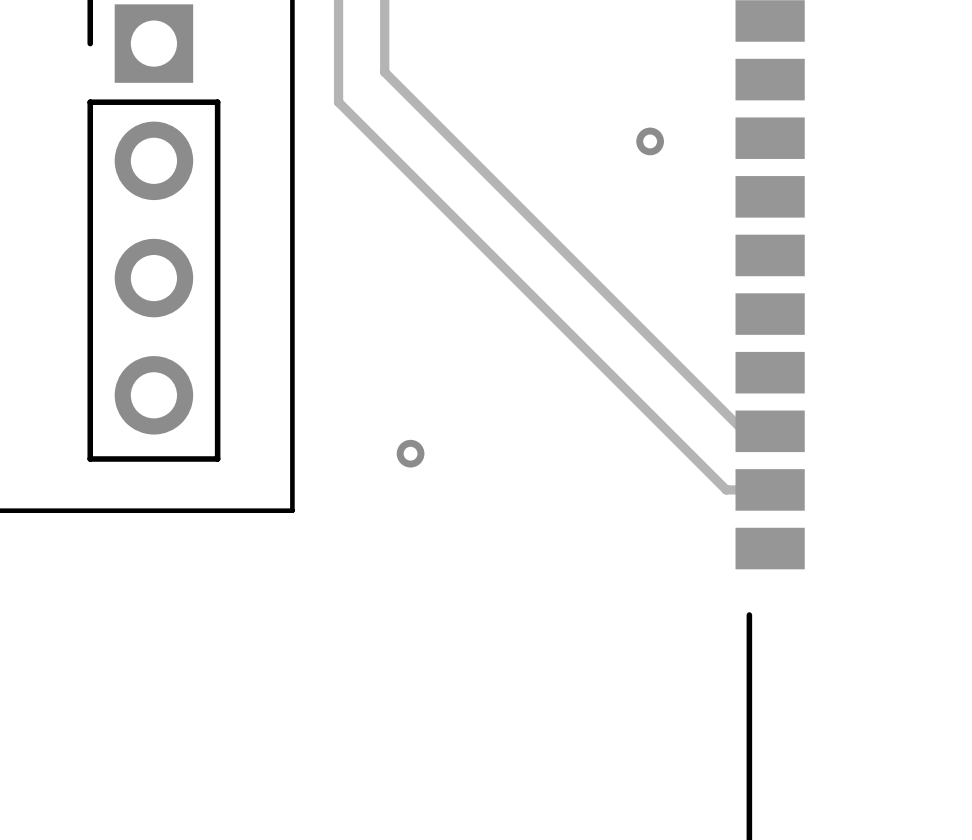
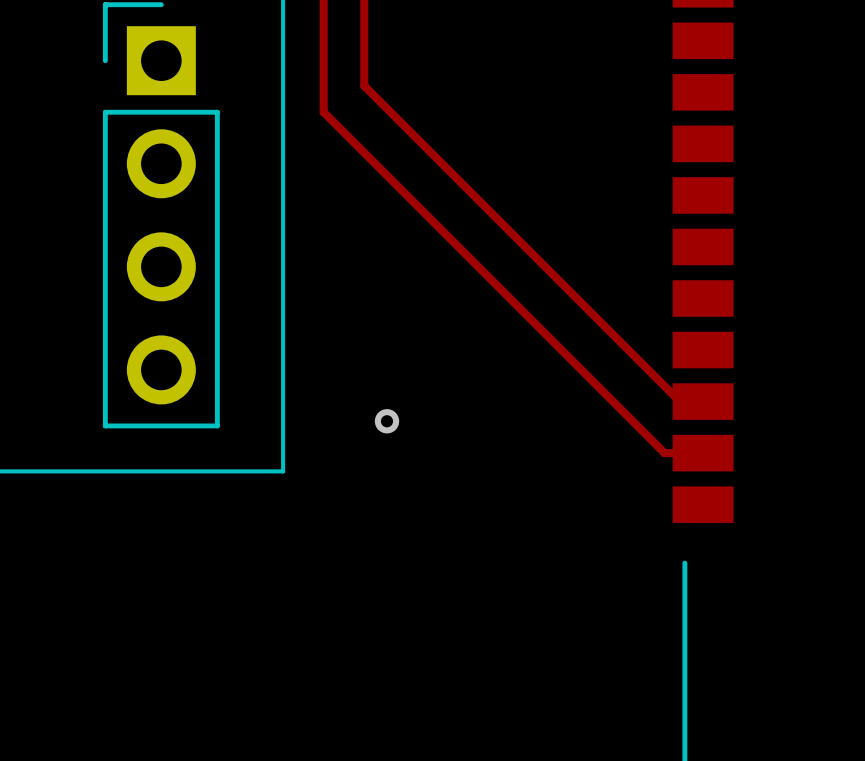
via: (650, 141) -> none

